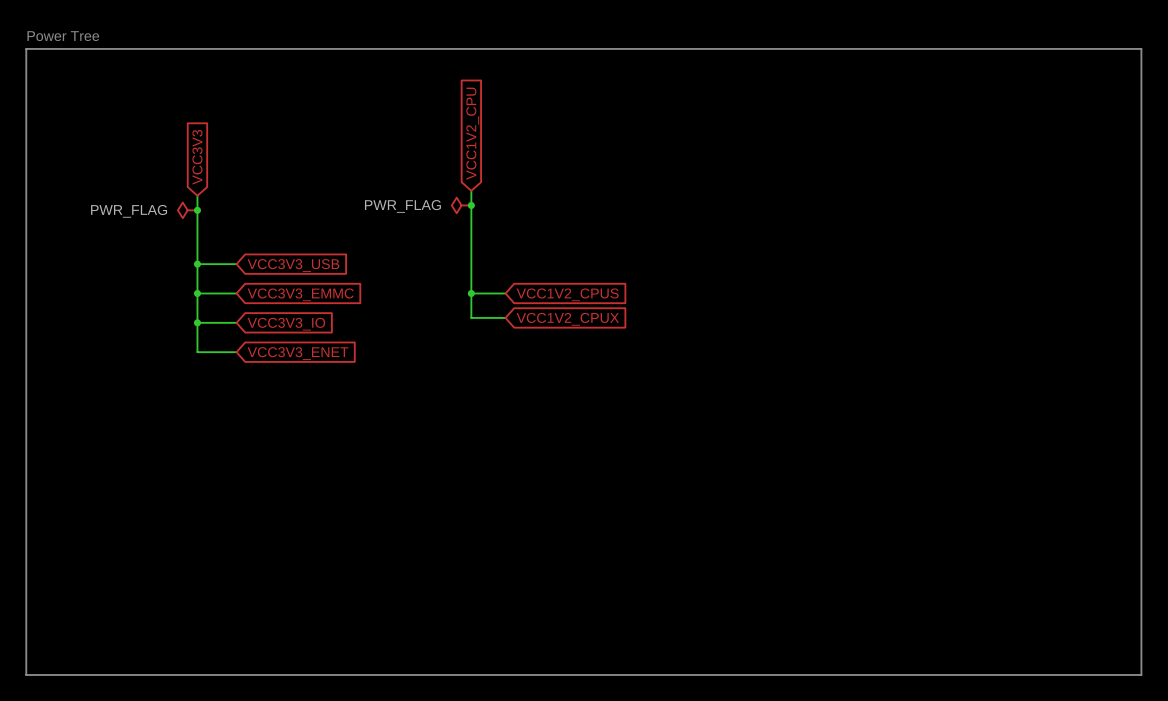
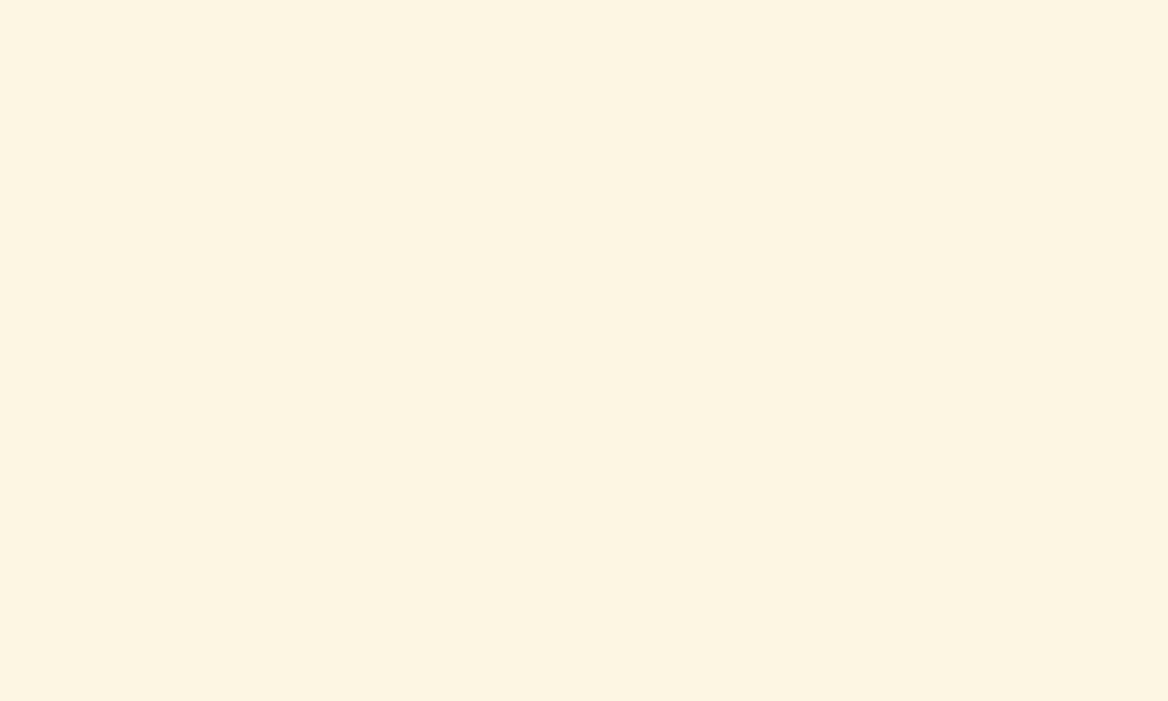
text: Power Tree (63, 36) -> none
line: (26, 48) (1141, 48) (1141, 674) (26, 674) (26, 48) -> none
global label: VCC1V2_CPU (472, 133) -> none
global label: VCC3V3 (197, 157) -> none
wire: (471, 190) (471, 317) (505, 317) -> none
wire: (197, 195) (197, 352) (236, 352) -> none
power symbol: PWR_FLAG (461, 205) -> none
junction: (471, 205) -> none
power symbol: PWR_FLAG (187, 210) -> none
junction: (197, 210) -> none
wire: (197, 264) (236, 264) -> none
junction: (197, 264) -> none
global label: VCC3V3_USB (293, 265) -> none
wire: (197, 293) (236, 293) -> none
junction: (197, 293) -> none
wire: (471, 293) (505, 293) -> none
junction: (471, 293) -> none
global label: VCC3V3_EMMC (300, 294) -> none
global label: VCC1V2_CPUS (567, 294) -> none
global label: VCC1V2_CPUX (567, 319) -> none
wire: (197, 322) (236, 322) -> none
junction: (197, 322) -> none
global label: VCC3V3_IO (286, 324) -> none
global label: VCC3V3_ENET (298, 353) -> none

